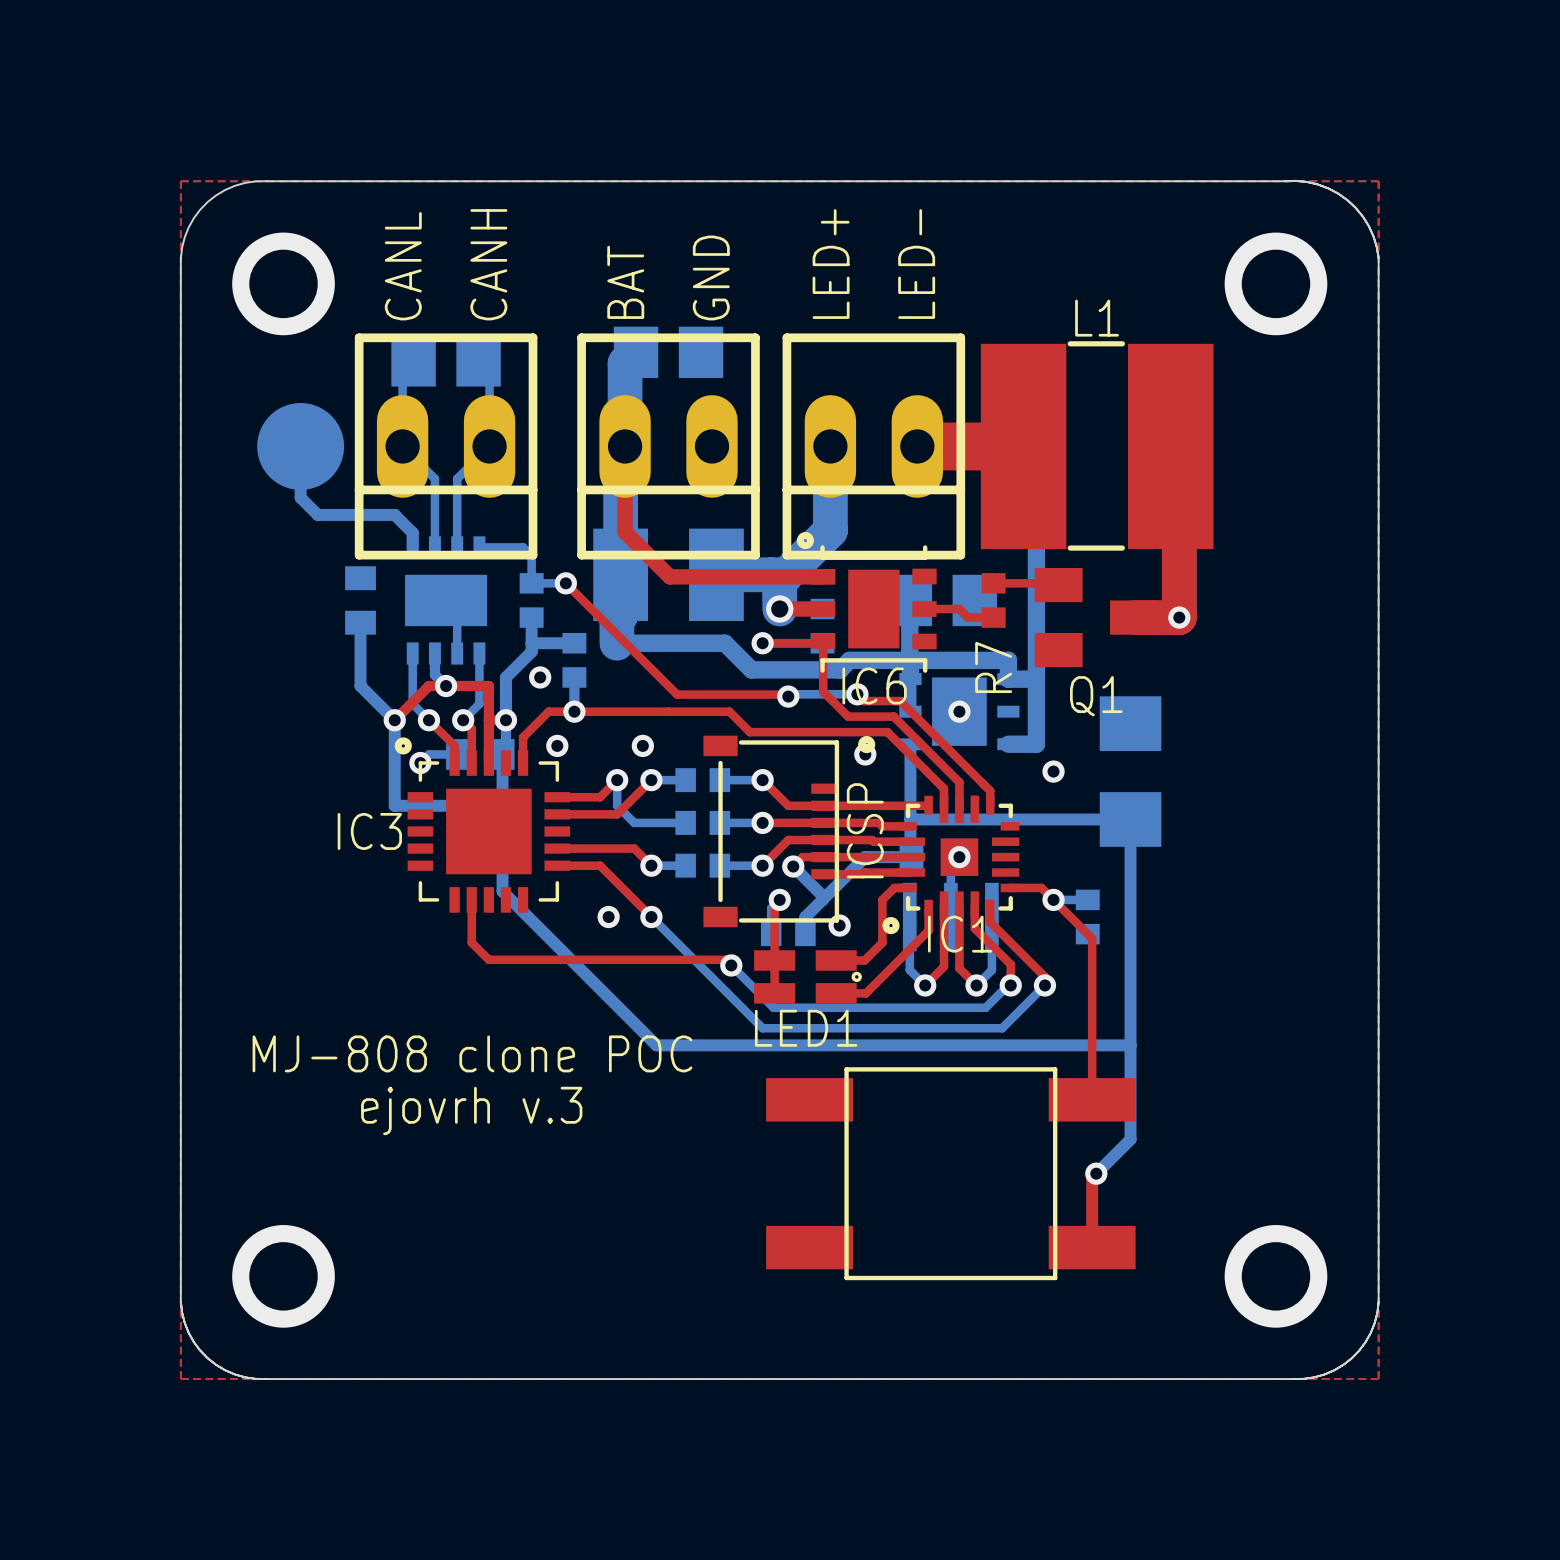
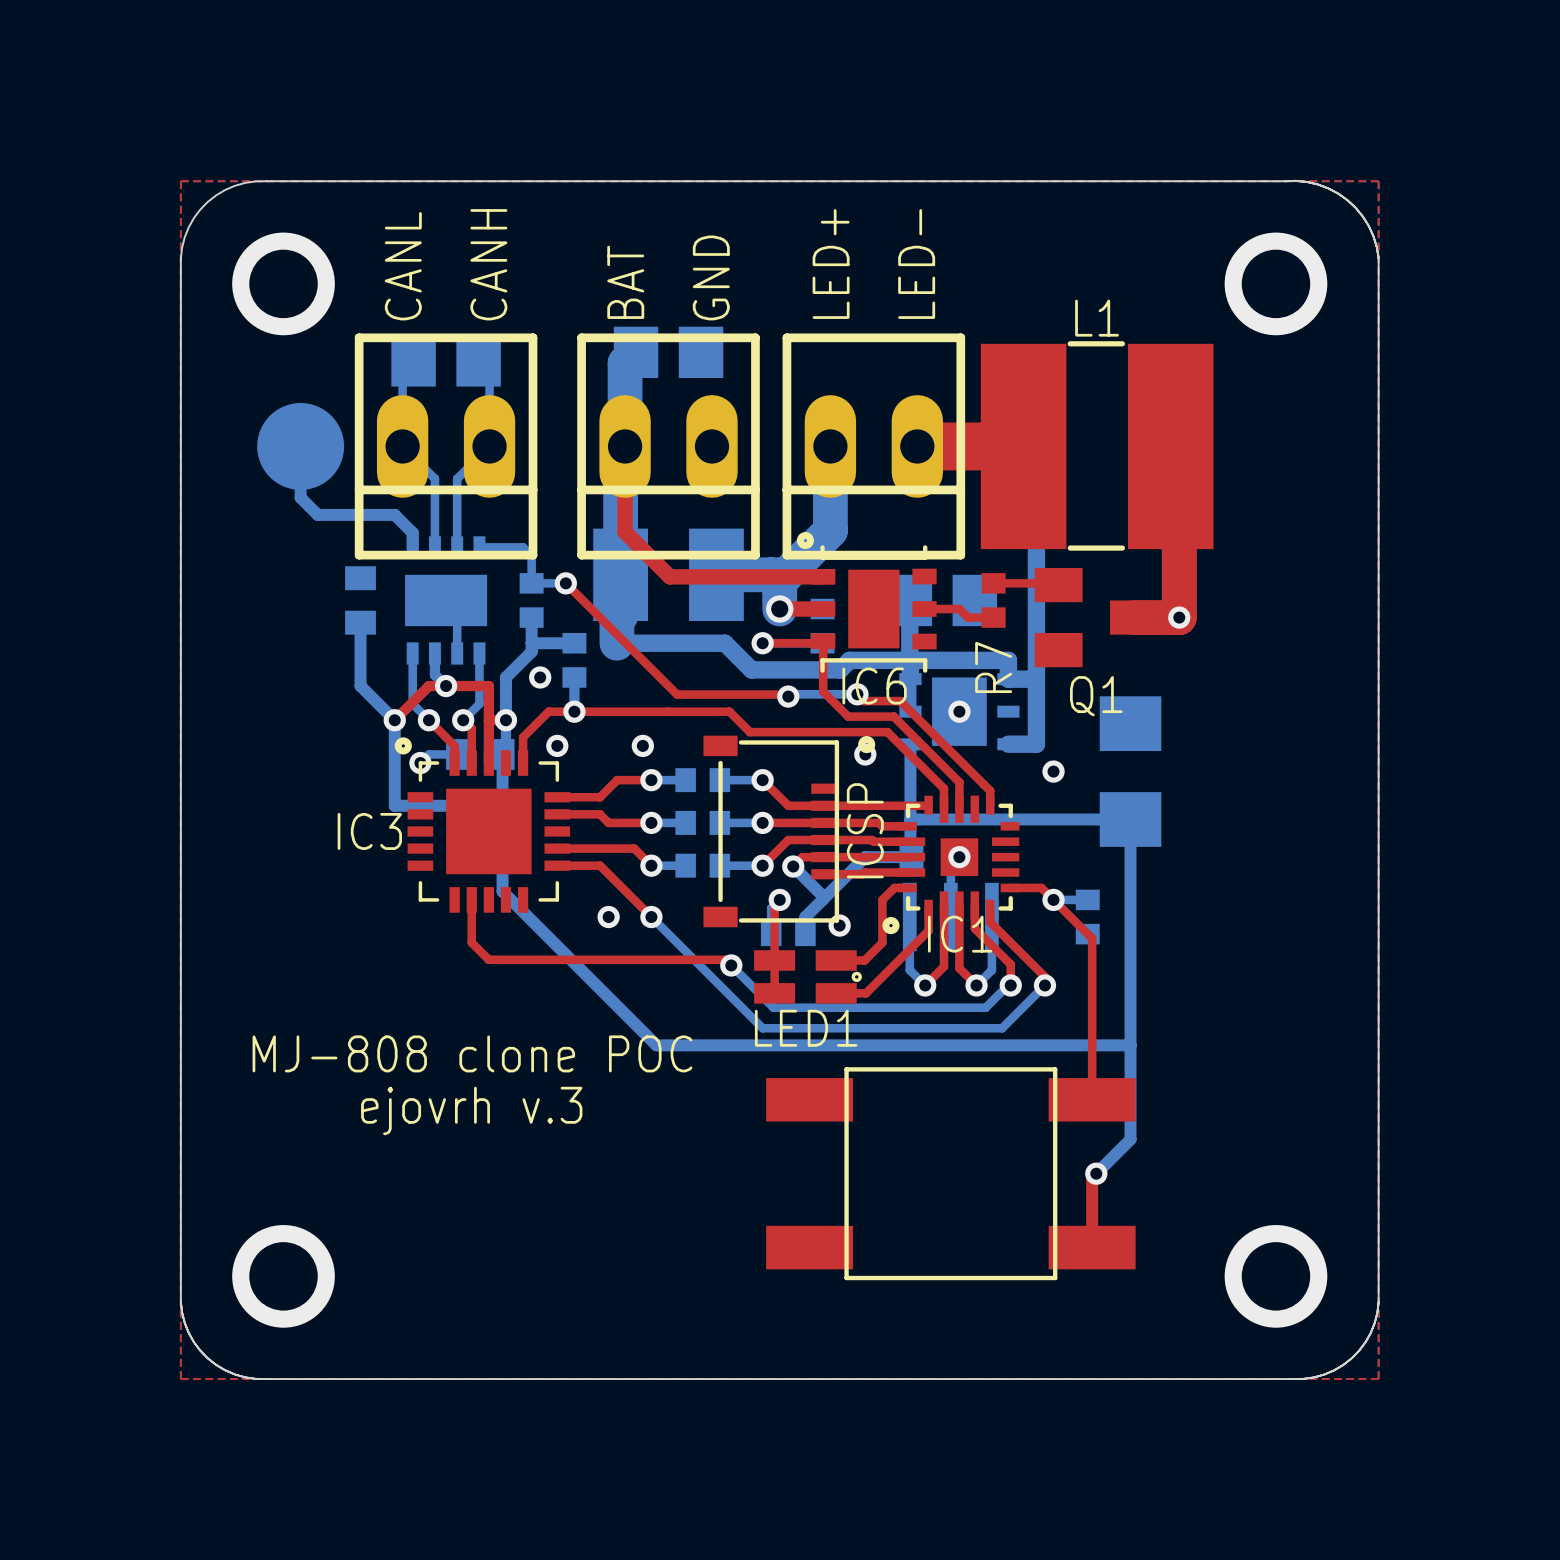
bottom track: (617, 780) (617, 805) (634, 822) (651, 822) -> none
via position: (617, 780) -> (651, 822)
top track: (651, 780) (617, 814) (600, 814) -> (651, 780) (617, 780)
top track: none -> (600, 814) (608, 822) (651, 822)

